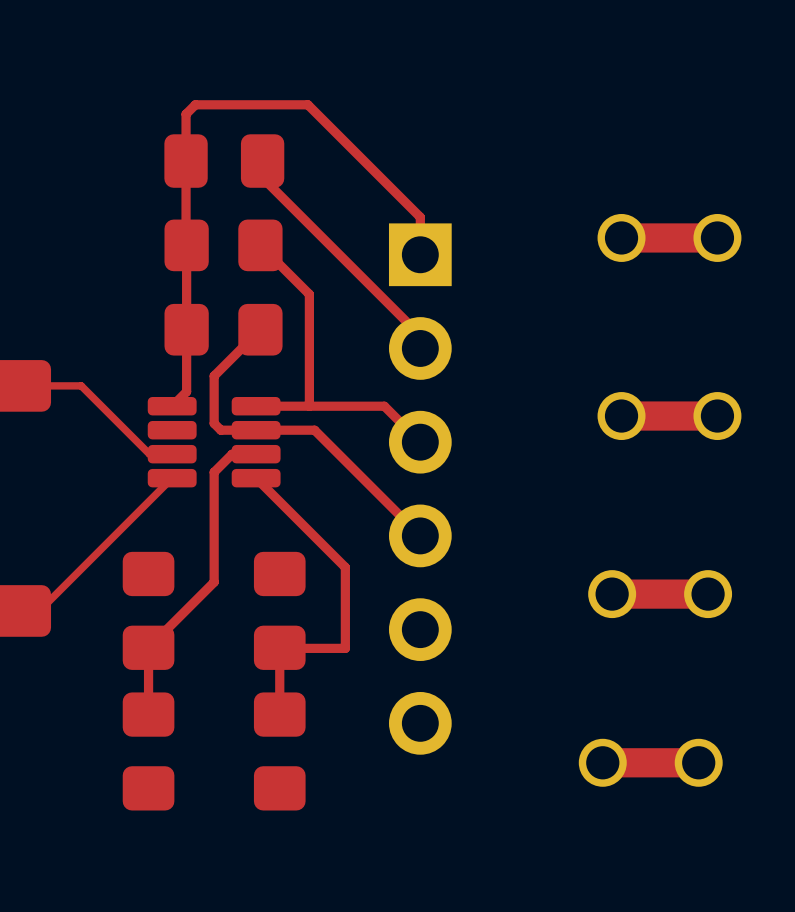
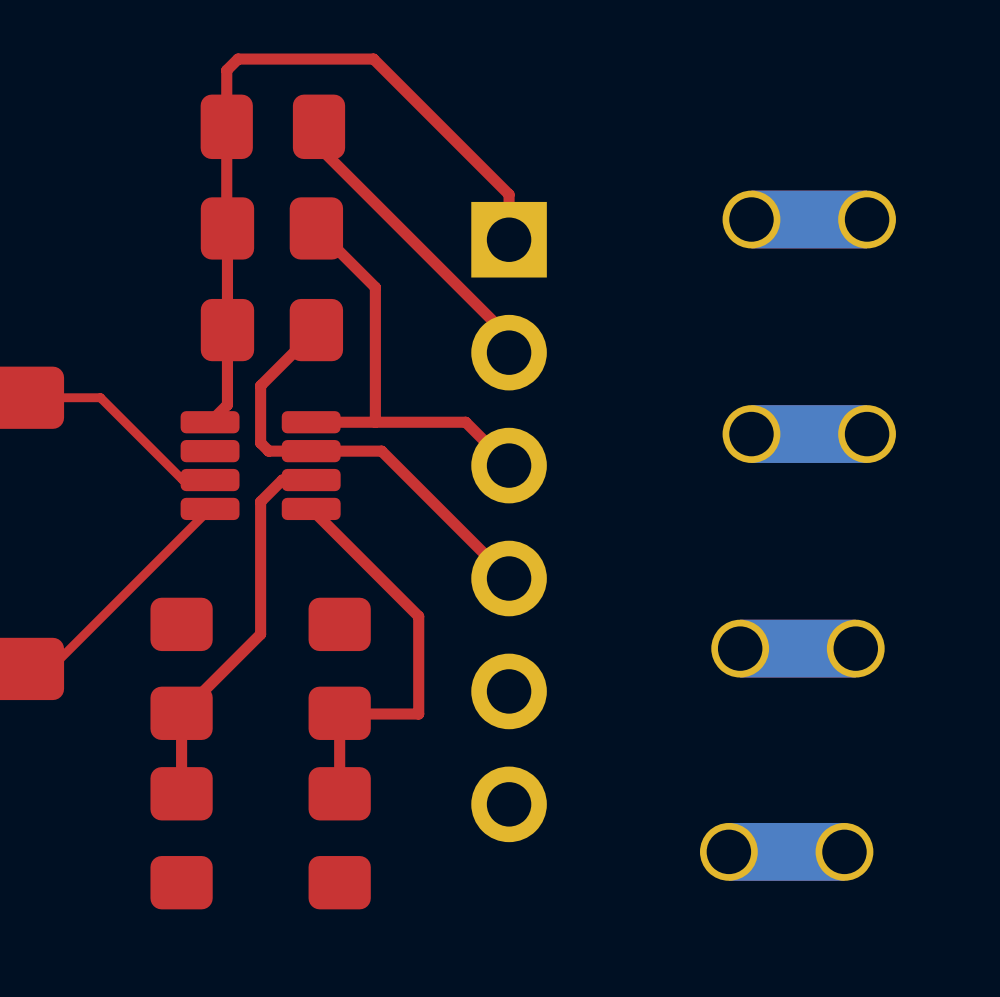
part footprint: [597, 213, 742, 262] -> [722, 190, 896, 249]
part footprint: [597, 392, 742, 441] -> [722, 405, 896, 463]
part footprint: [588, 570, 733, 619] -> [711, 619, 885, 678]
part footprint: [578, 738, 723, 787] -> [699, 822, 874, 881]

